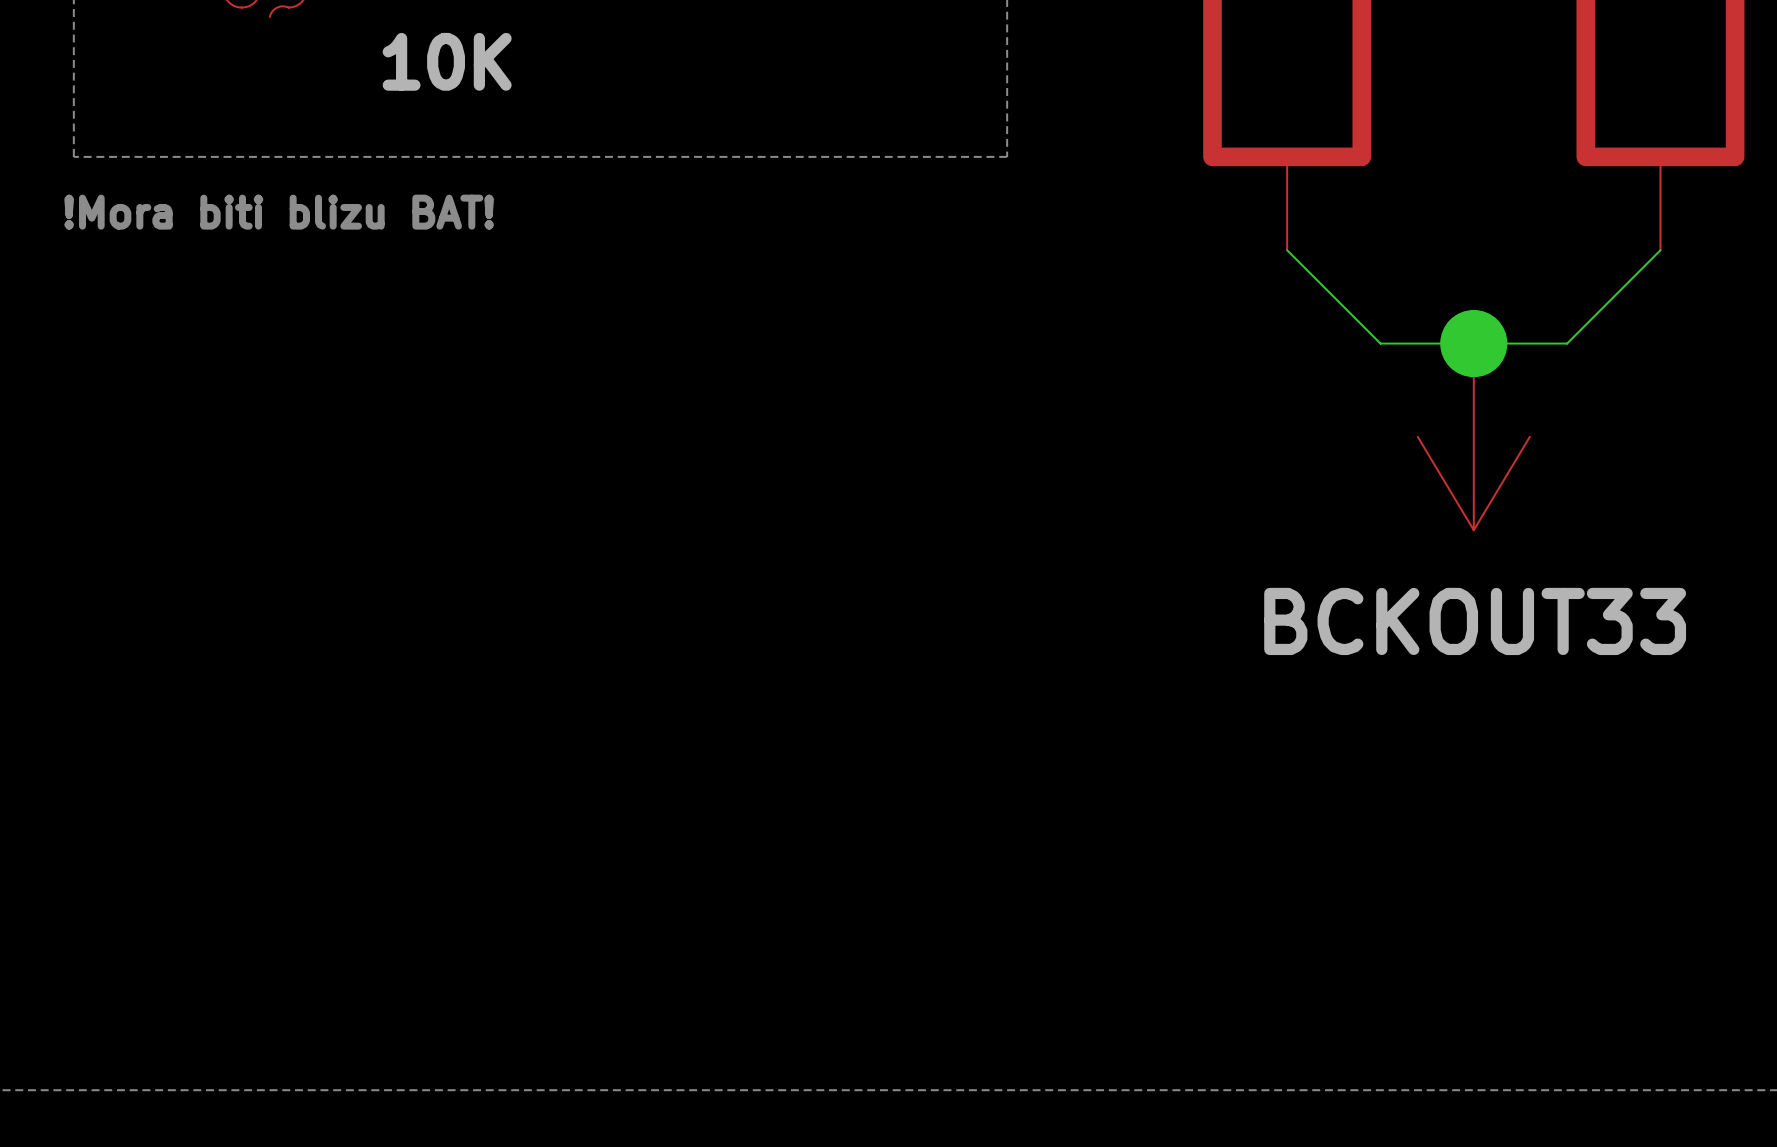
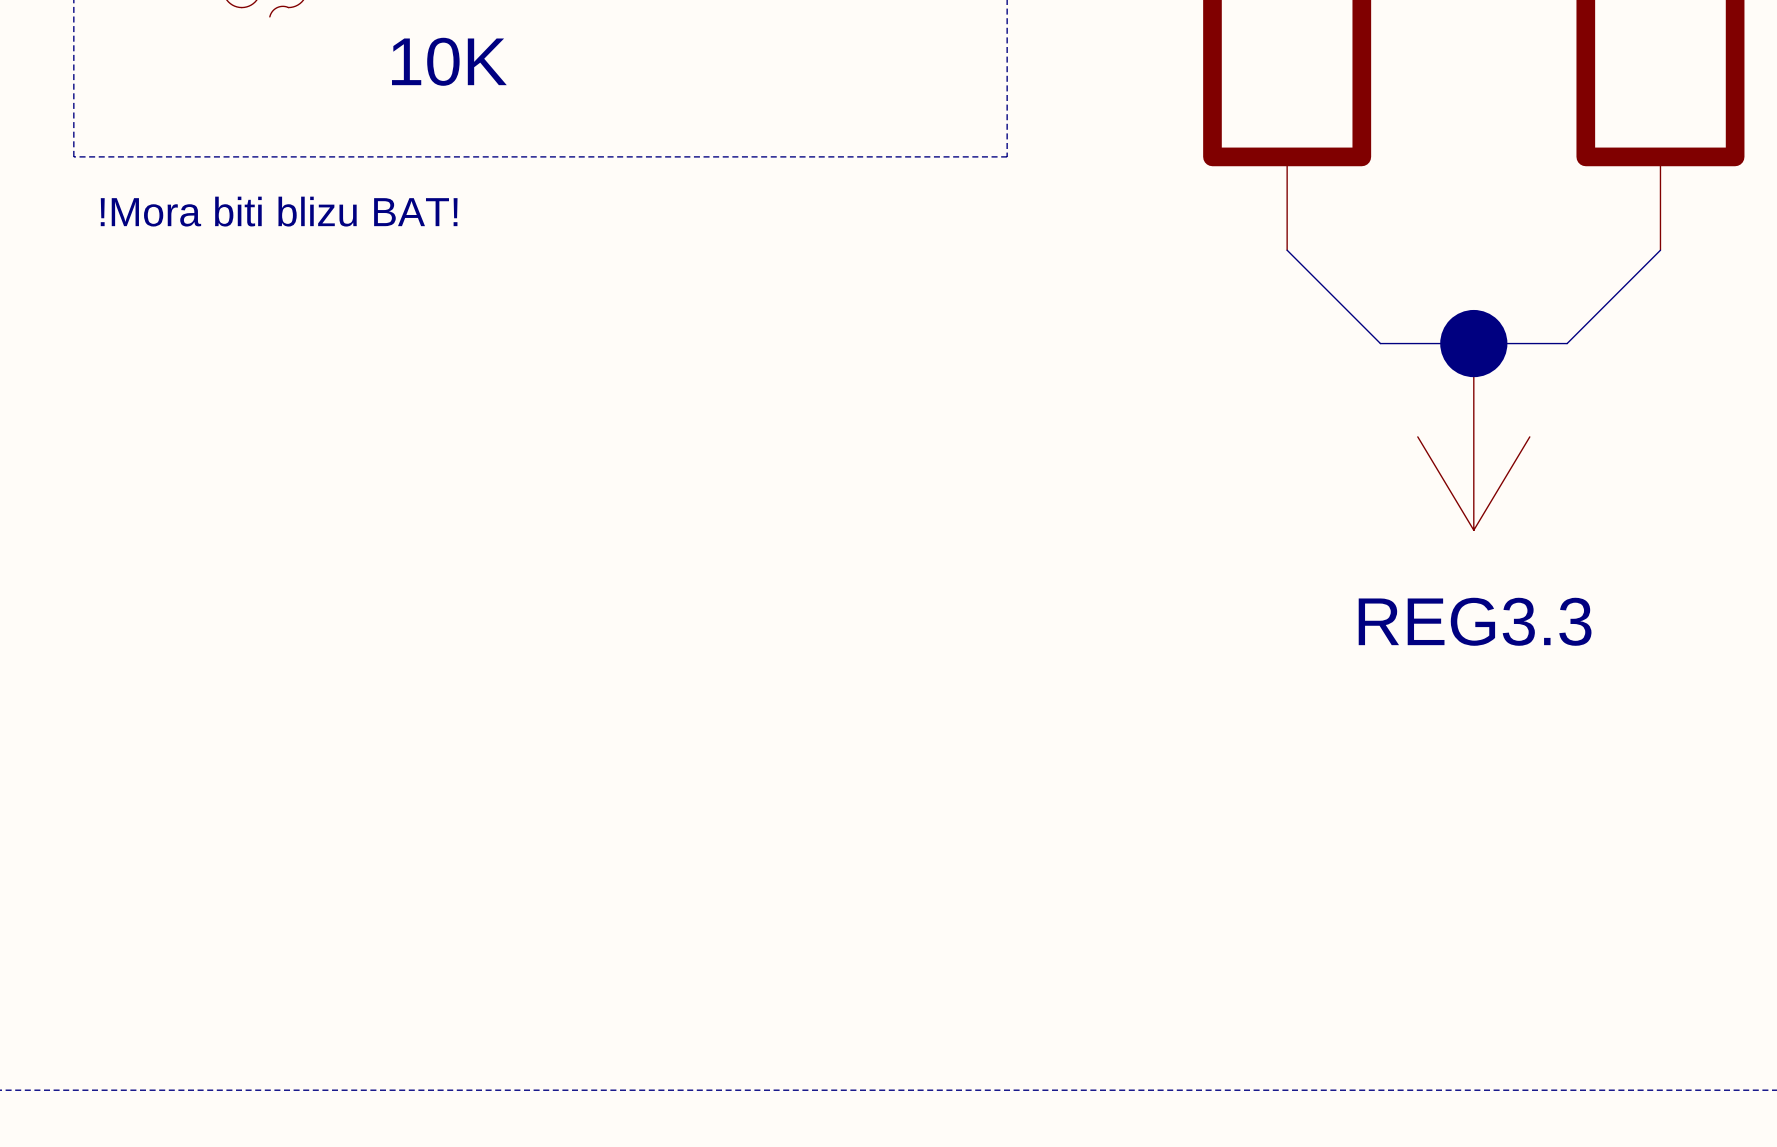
power symbol: BCKOUT33 (1473, 436) -> REG3.3 (1473, 436)

